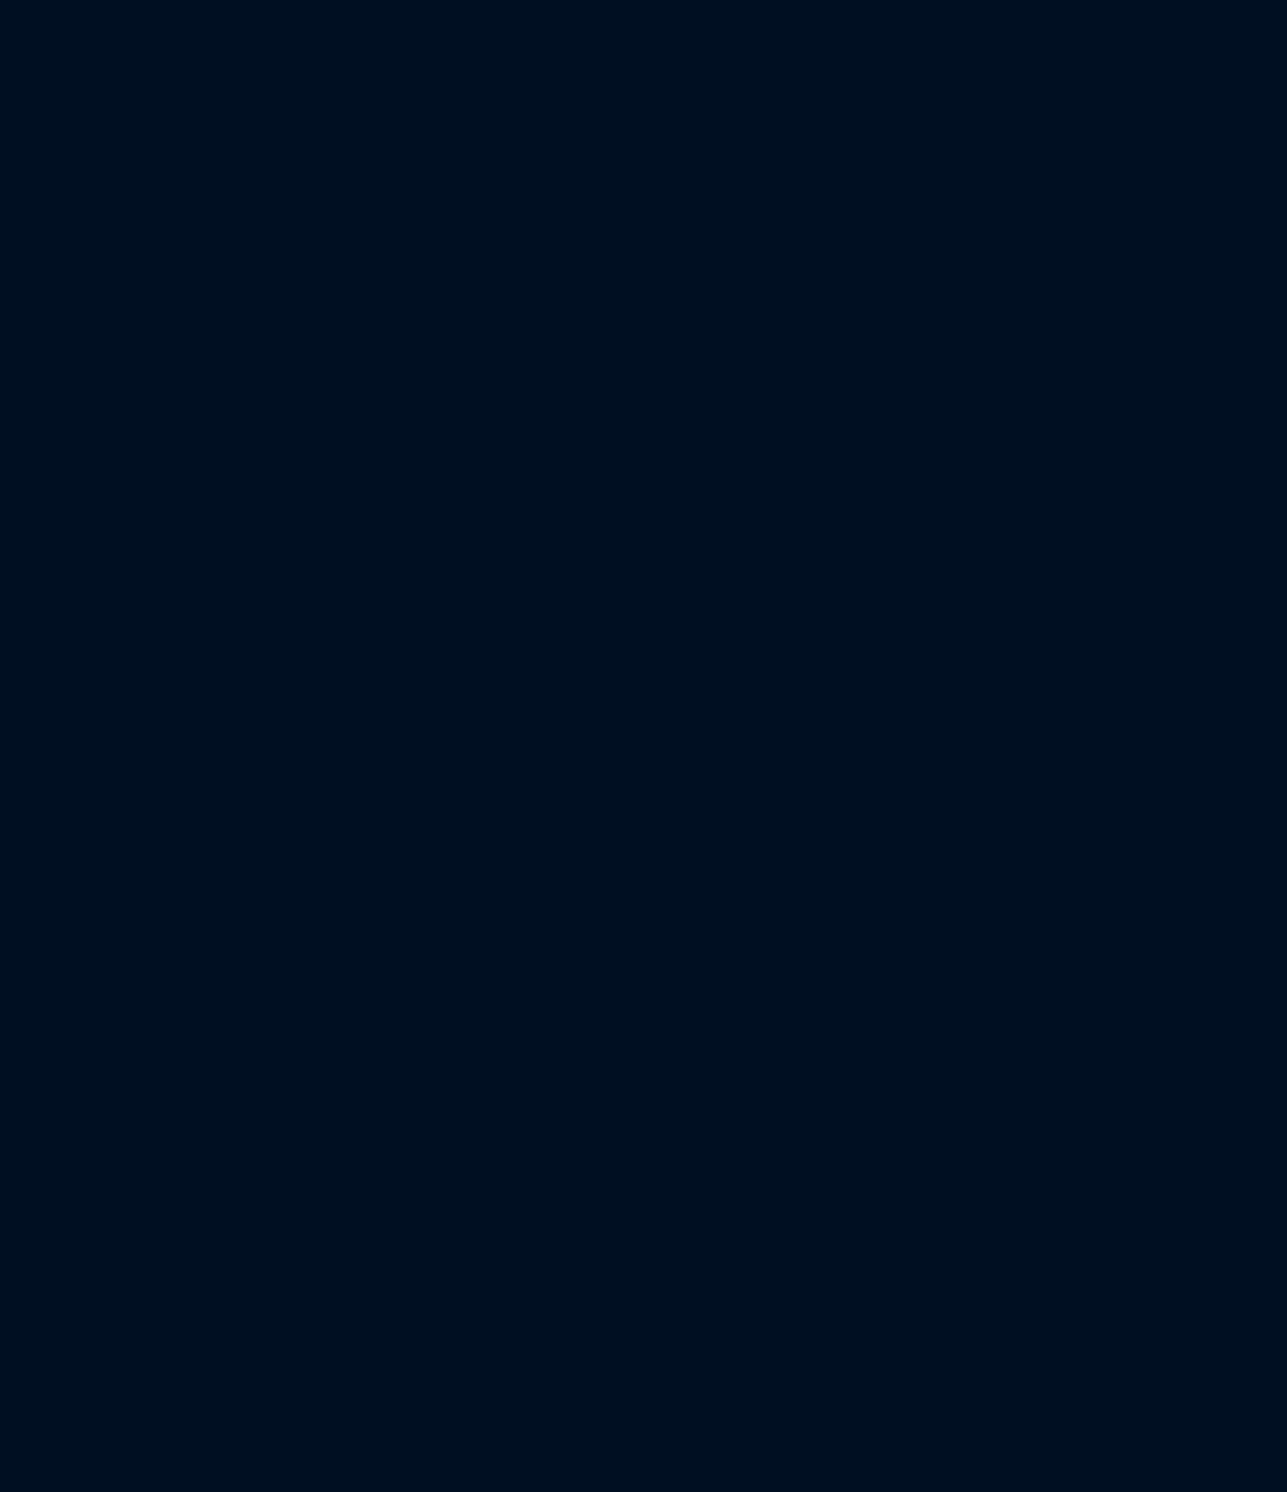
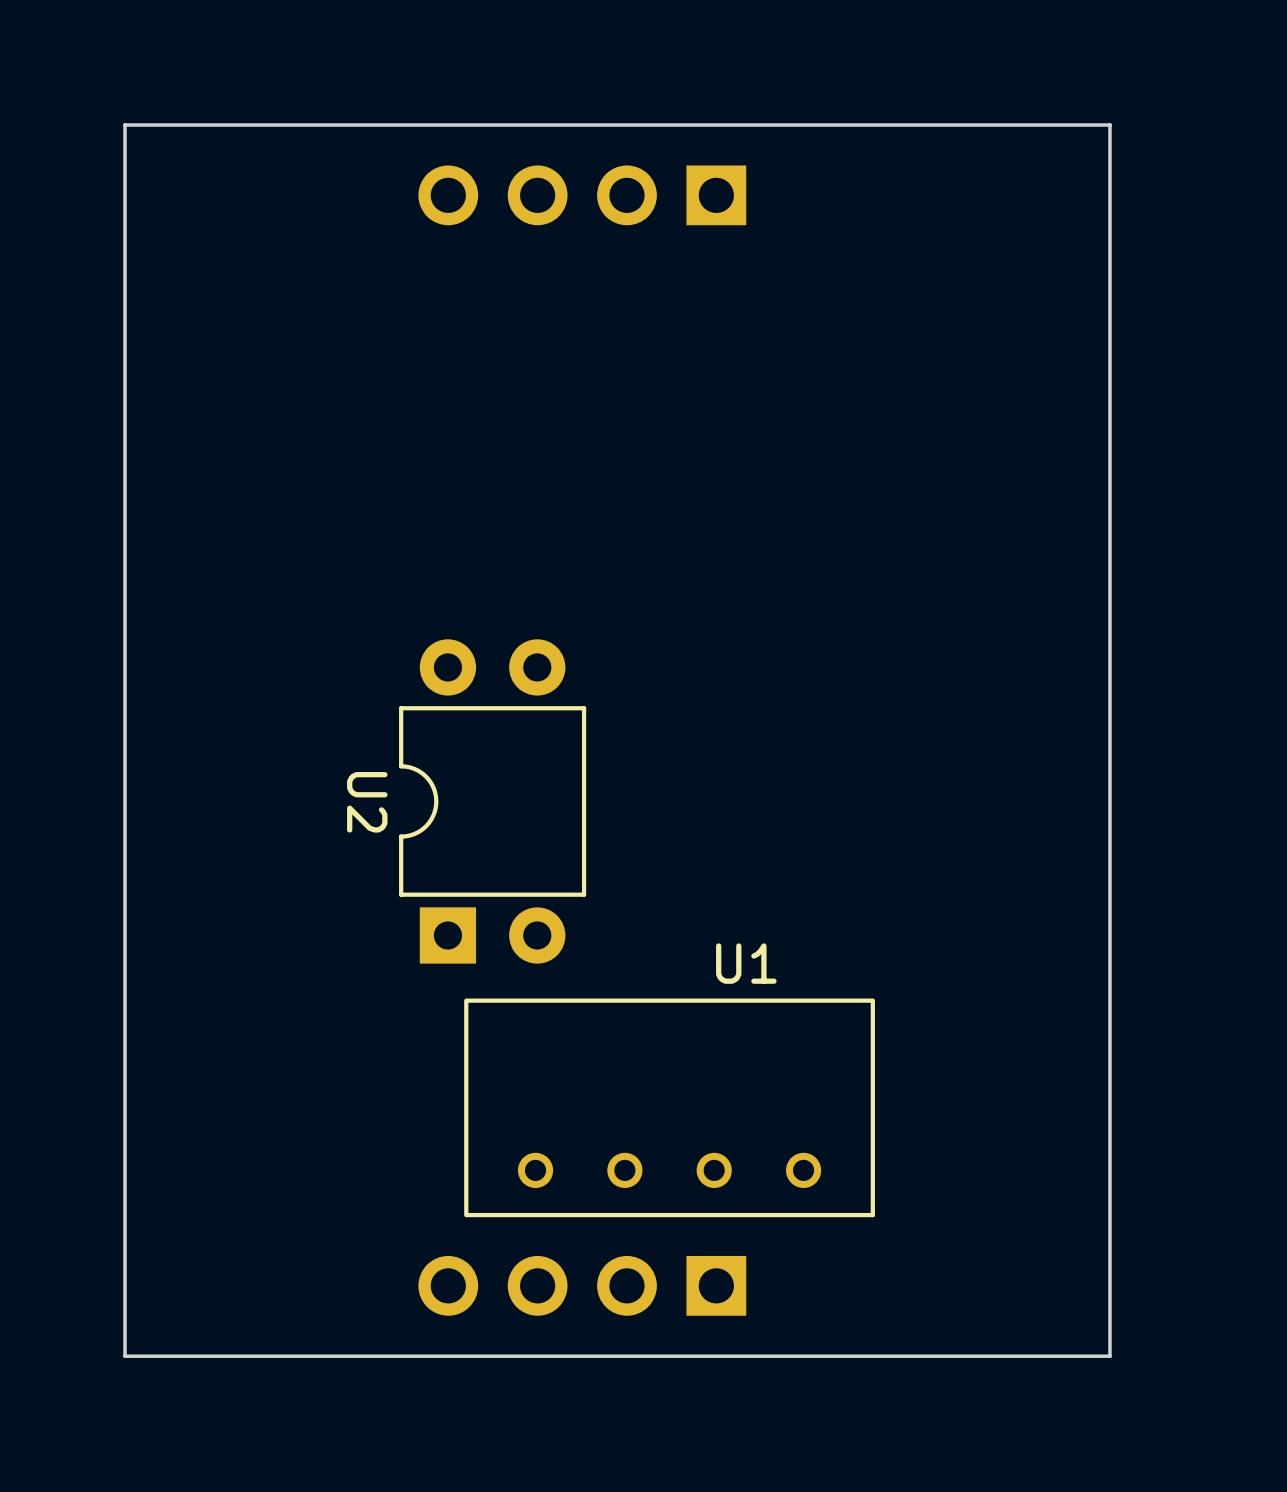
board edge: none -> (1109, 125) (125, 125) (125, 1356) (1109, 1356) (1109, 125)
part: none -> (582, 195)
U2: none -> (492, 801)
U1: none -> (669, 1107)
part: none -> (582, 1285)

